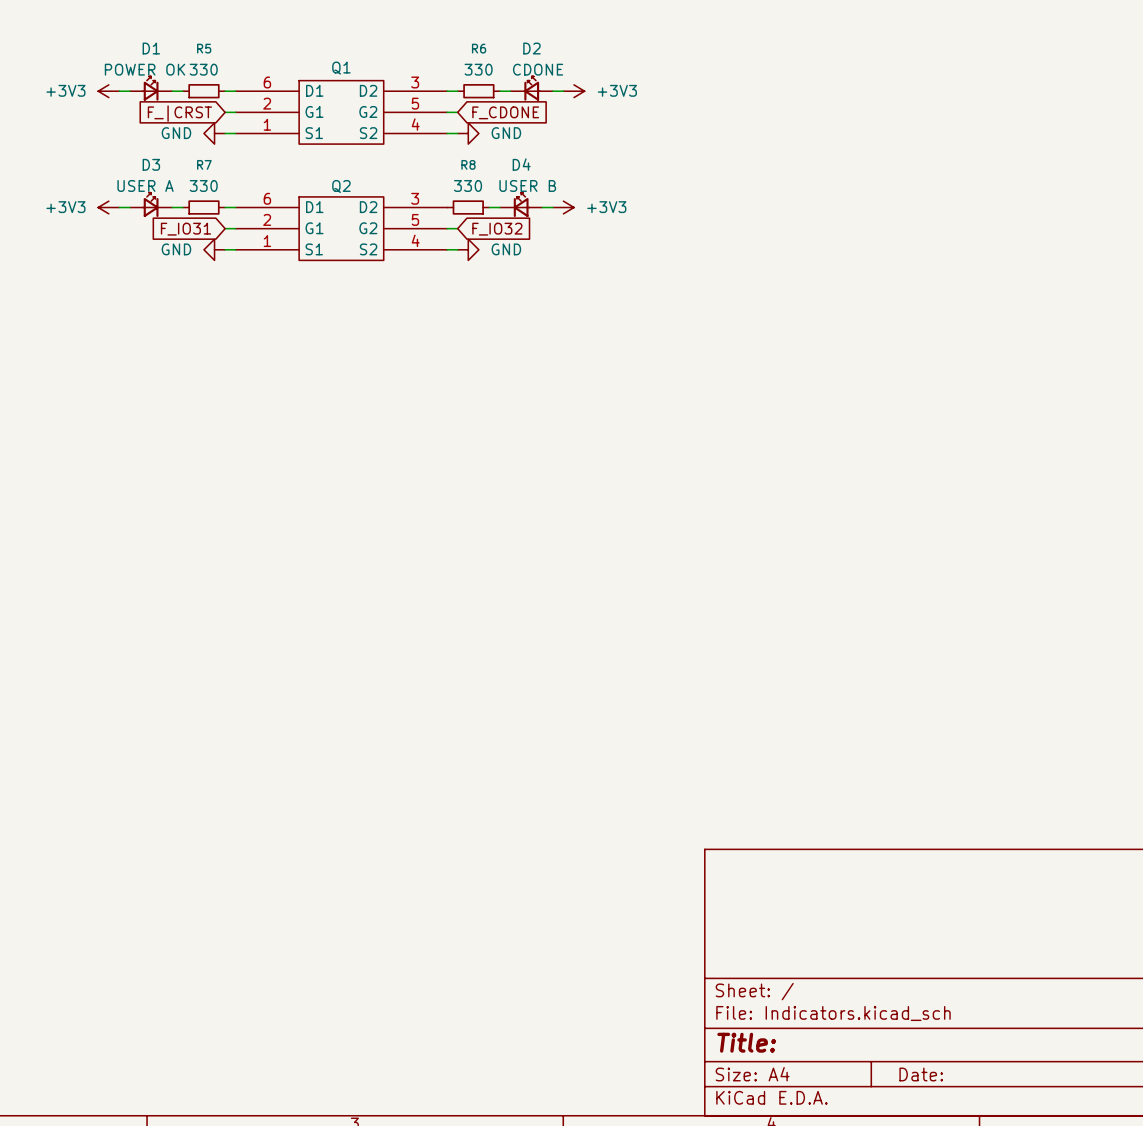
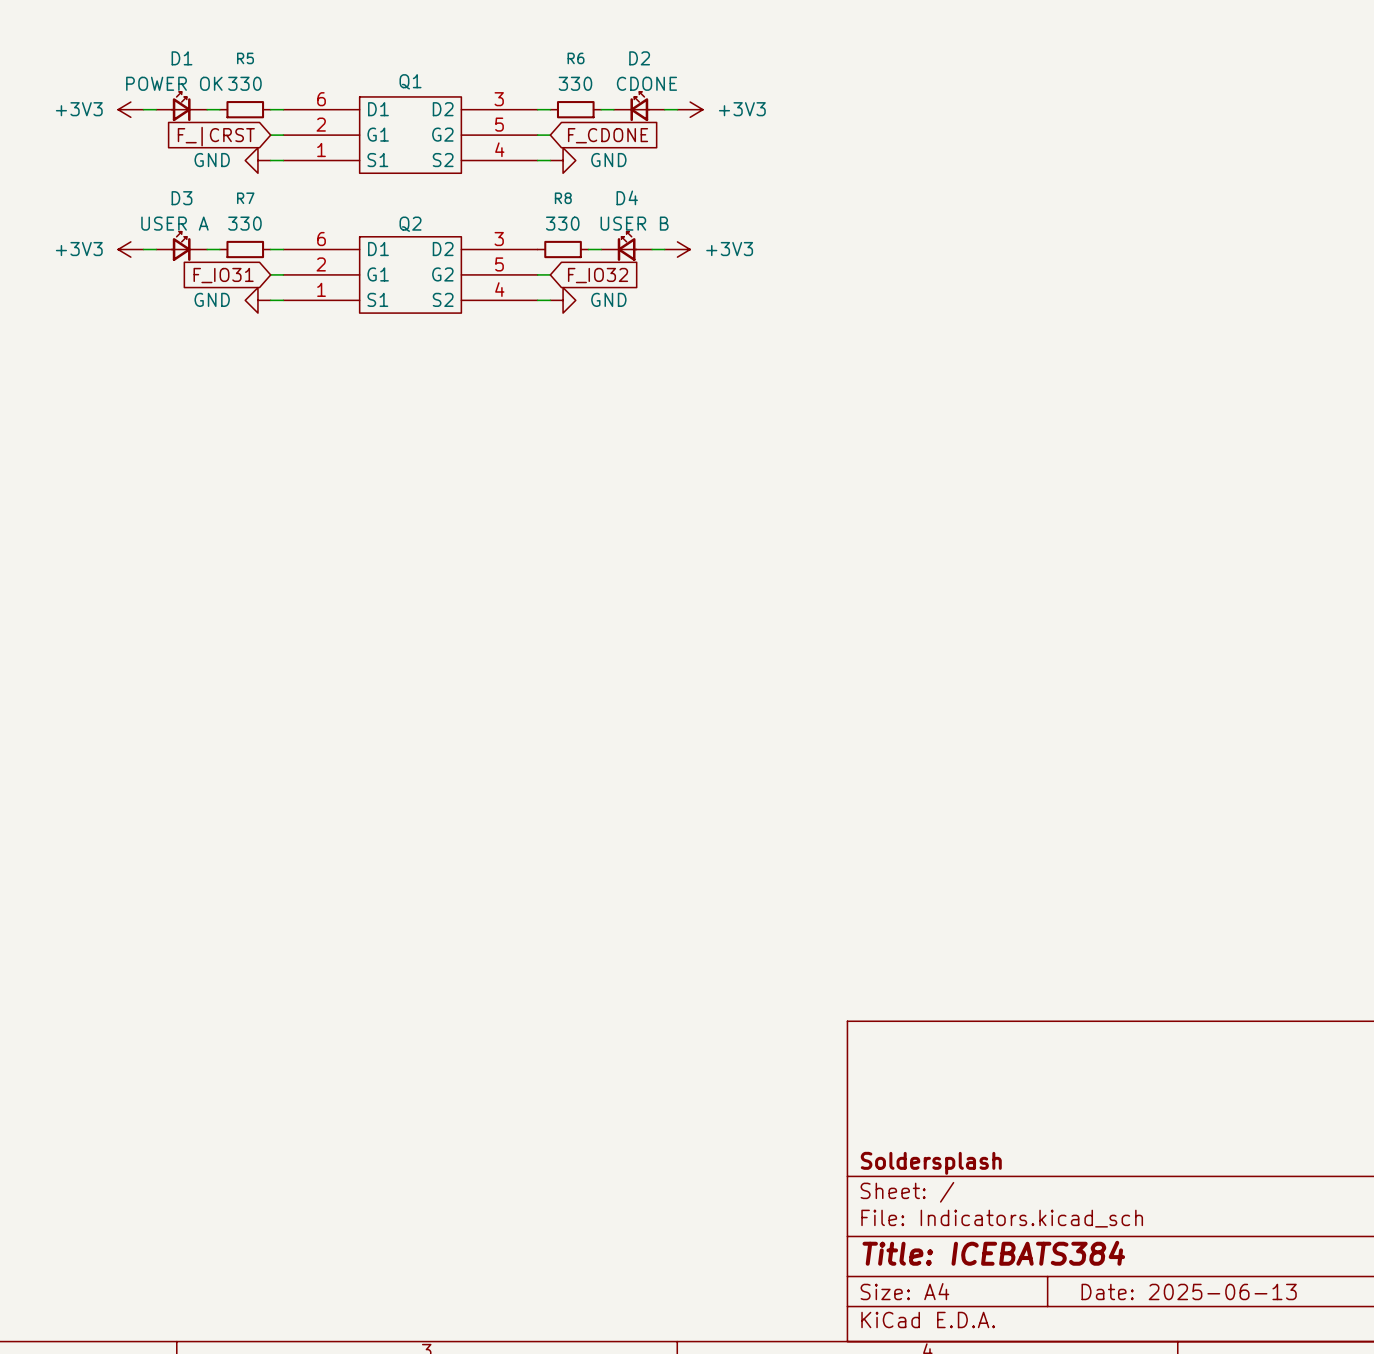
title block: none -> Soldersplash (931, 1163)
title block: Title: (746, 1042) -> Title: ICEBATS384 (993, 1253)
title block: Date: (921, 1074) -> Date: 2025-06-13 (1189, 1291)

